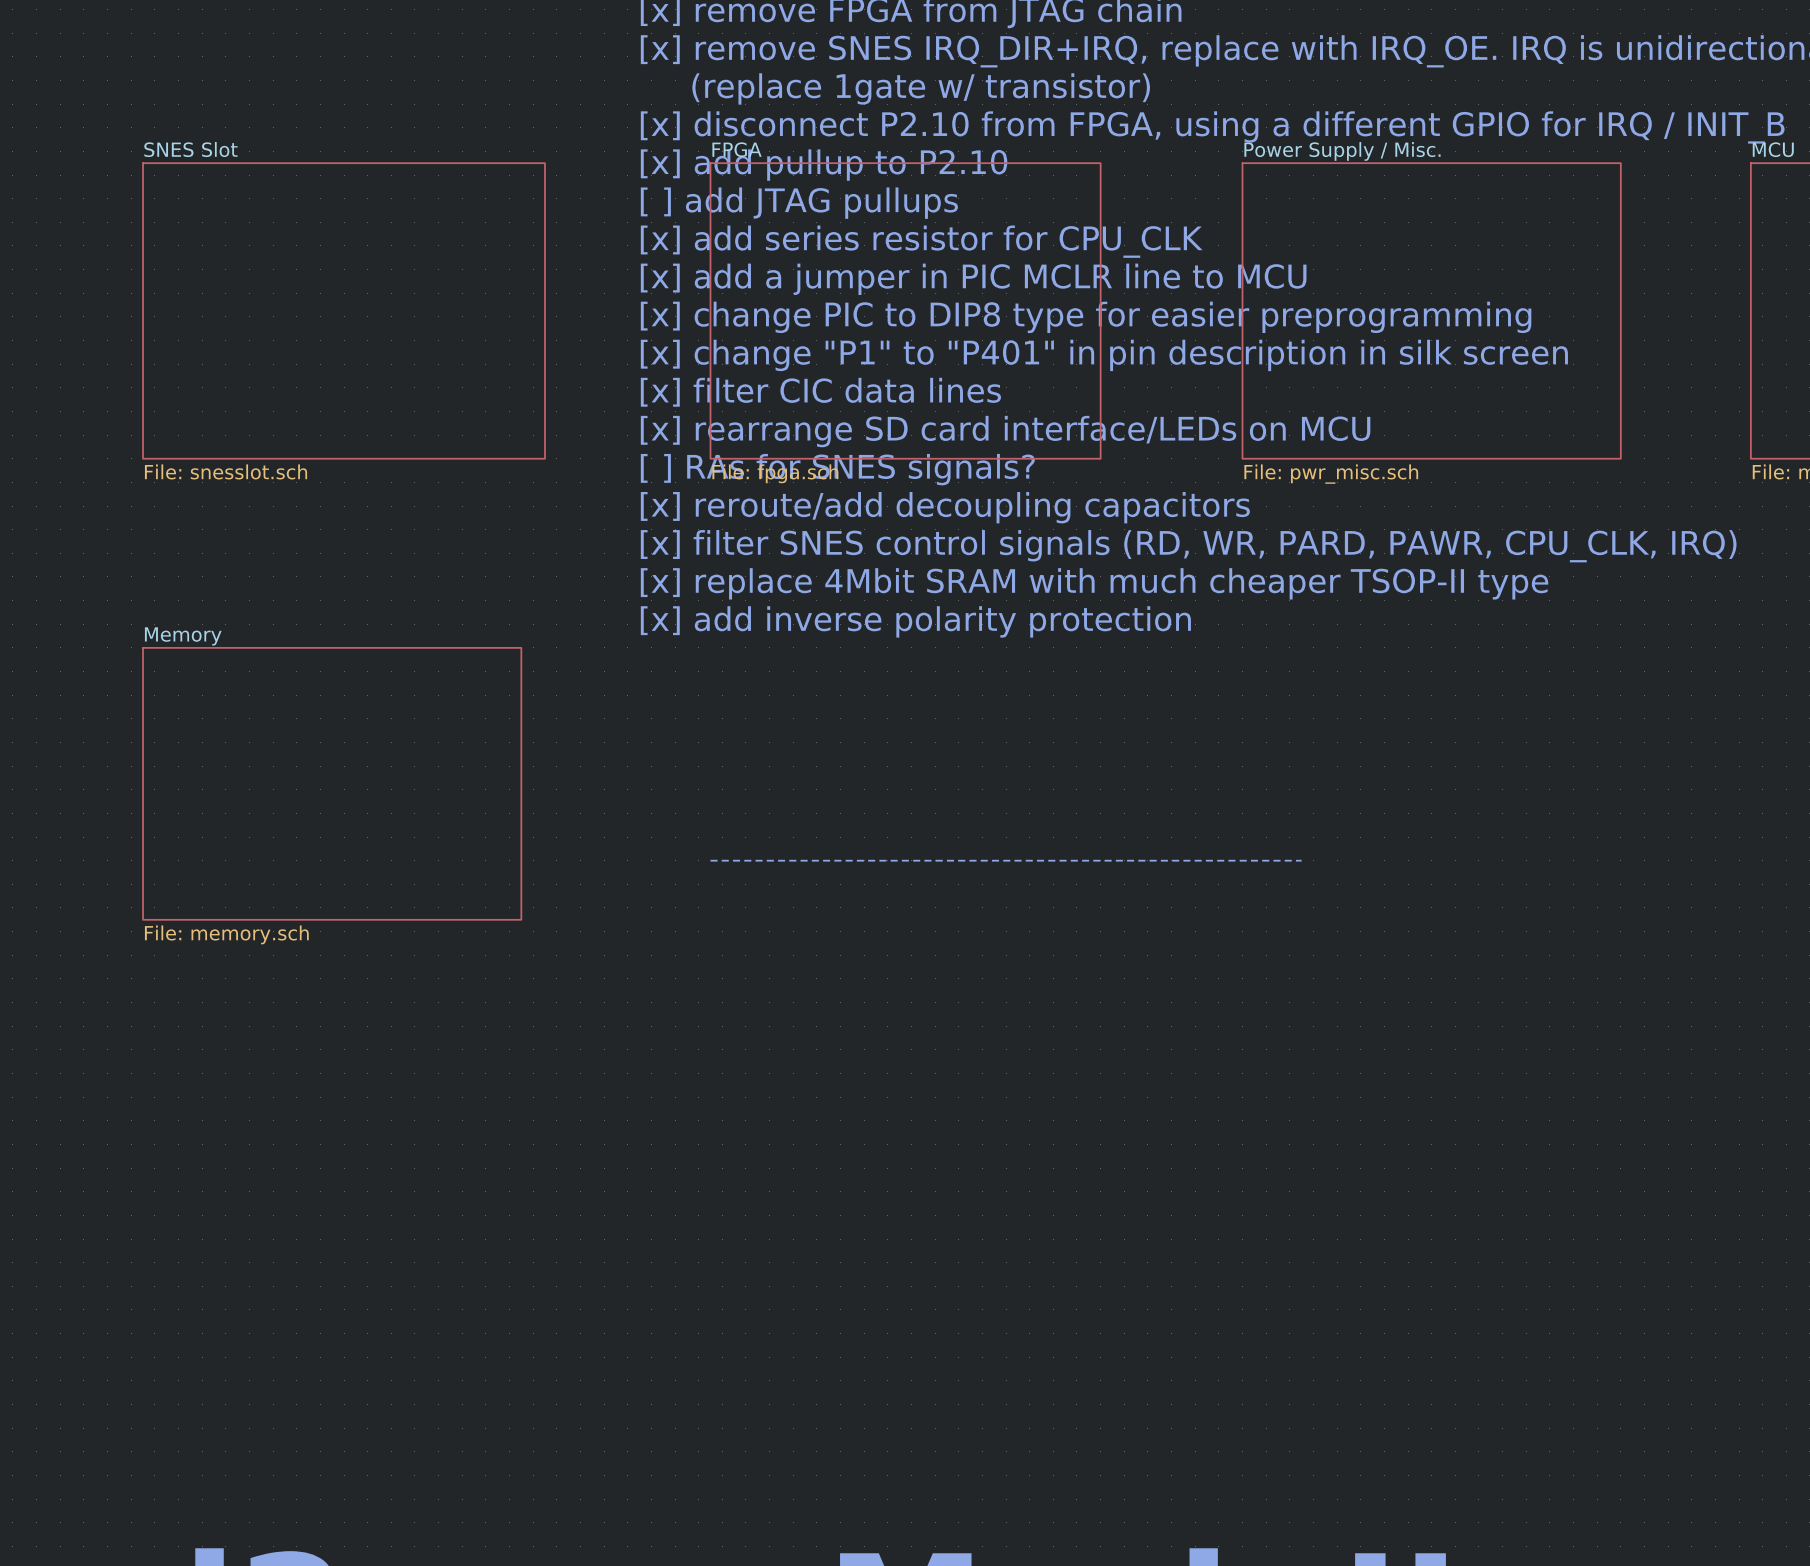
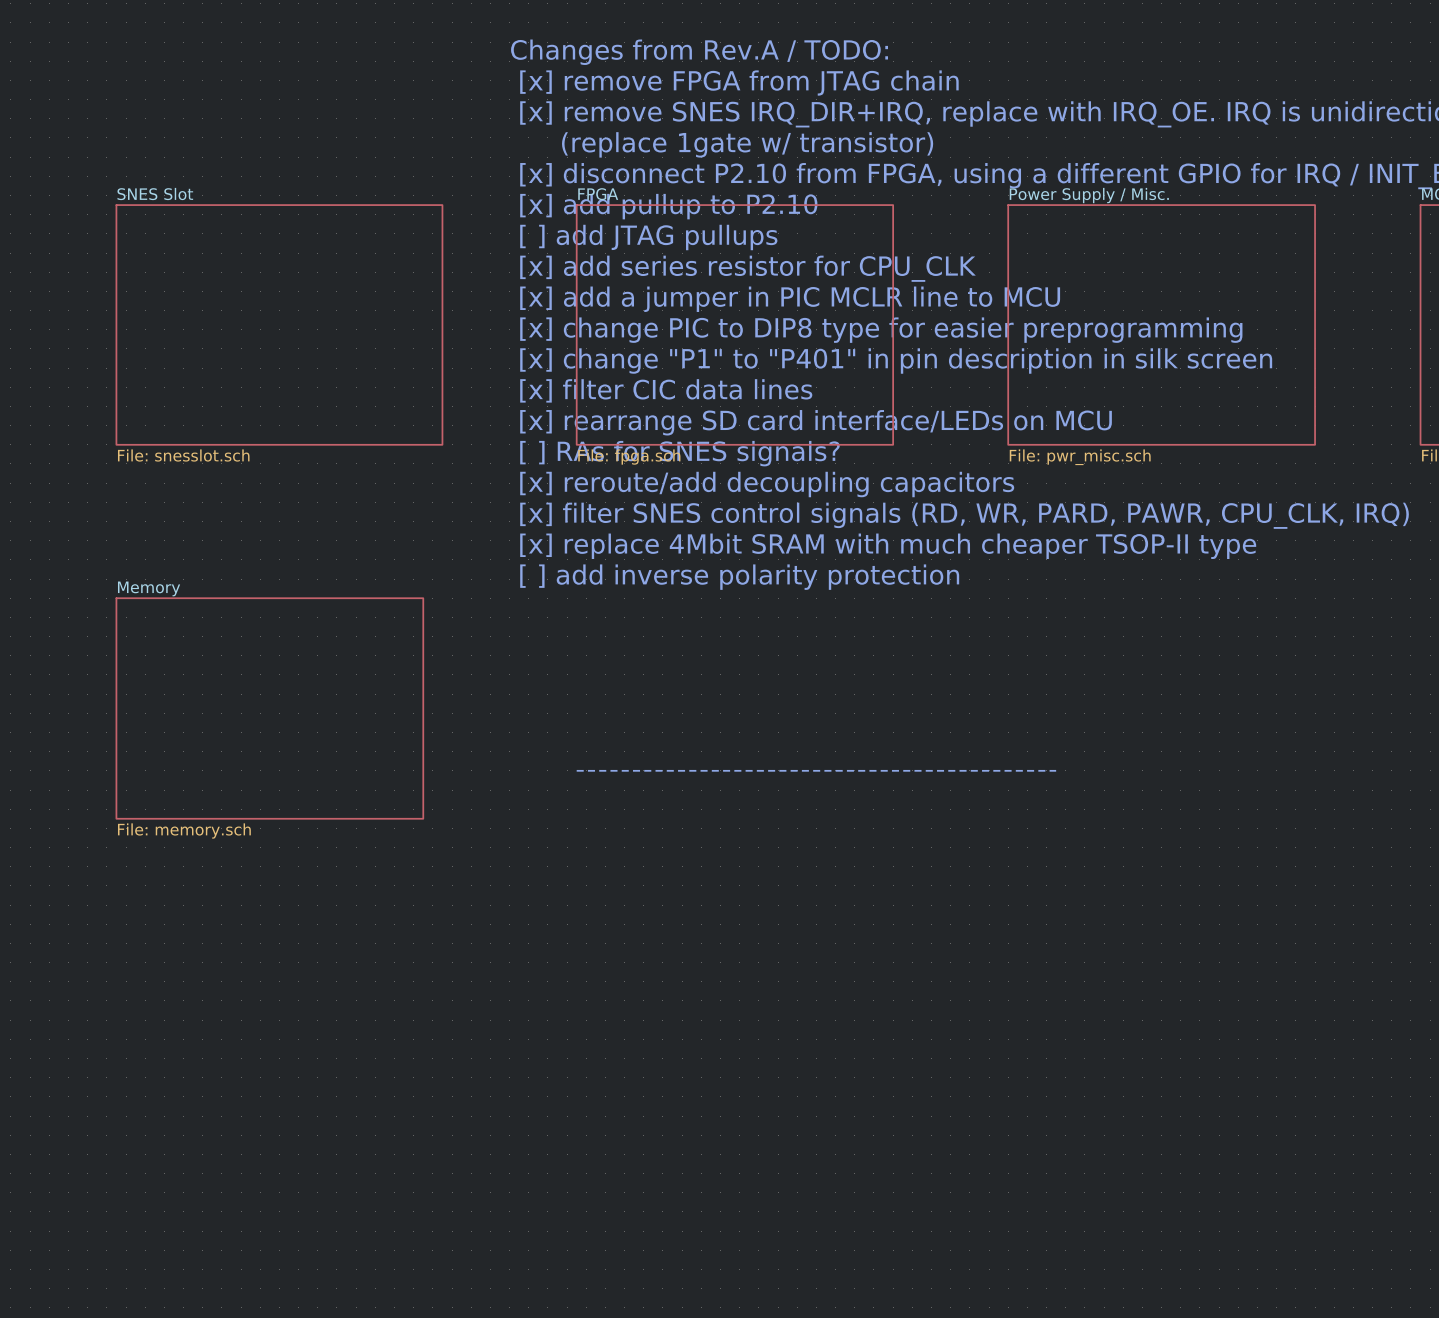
text: [x] add inverse polarity protection (915, 621) -> [ ] add inverse polarity protection (739, 577)

